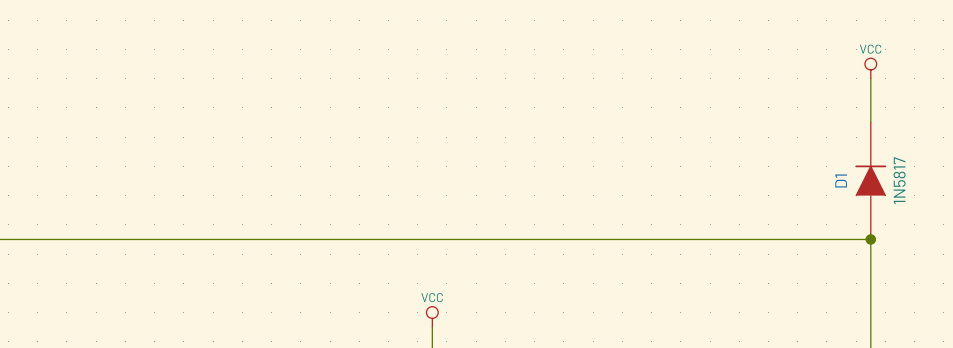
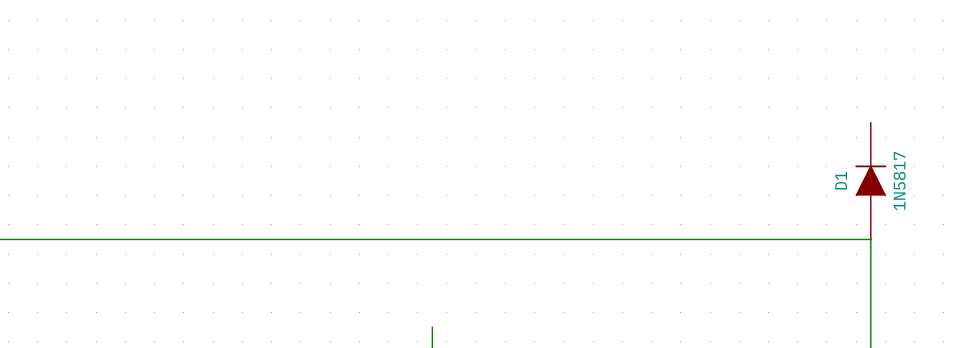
power symbol: VCC (870, 68) -> none
wire: (870, 78) (870, 122) -> none
junction: (870, 239) -> none
power symbol: VCC (432, 316) -> none

